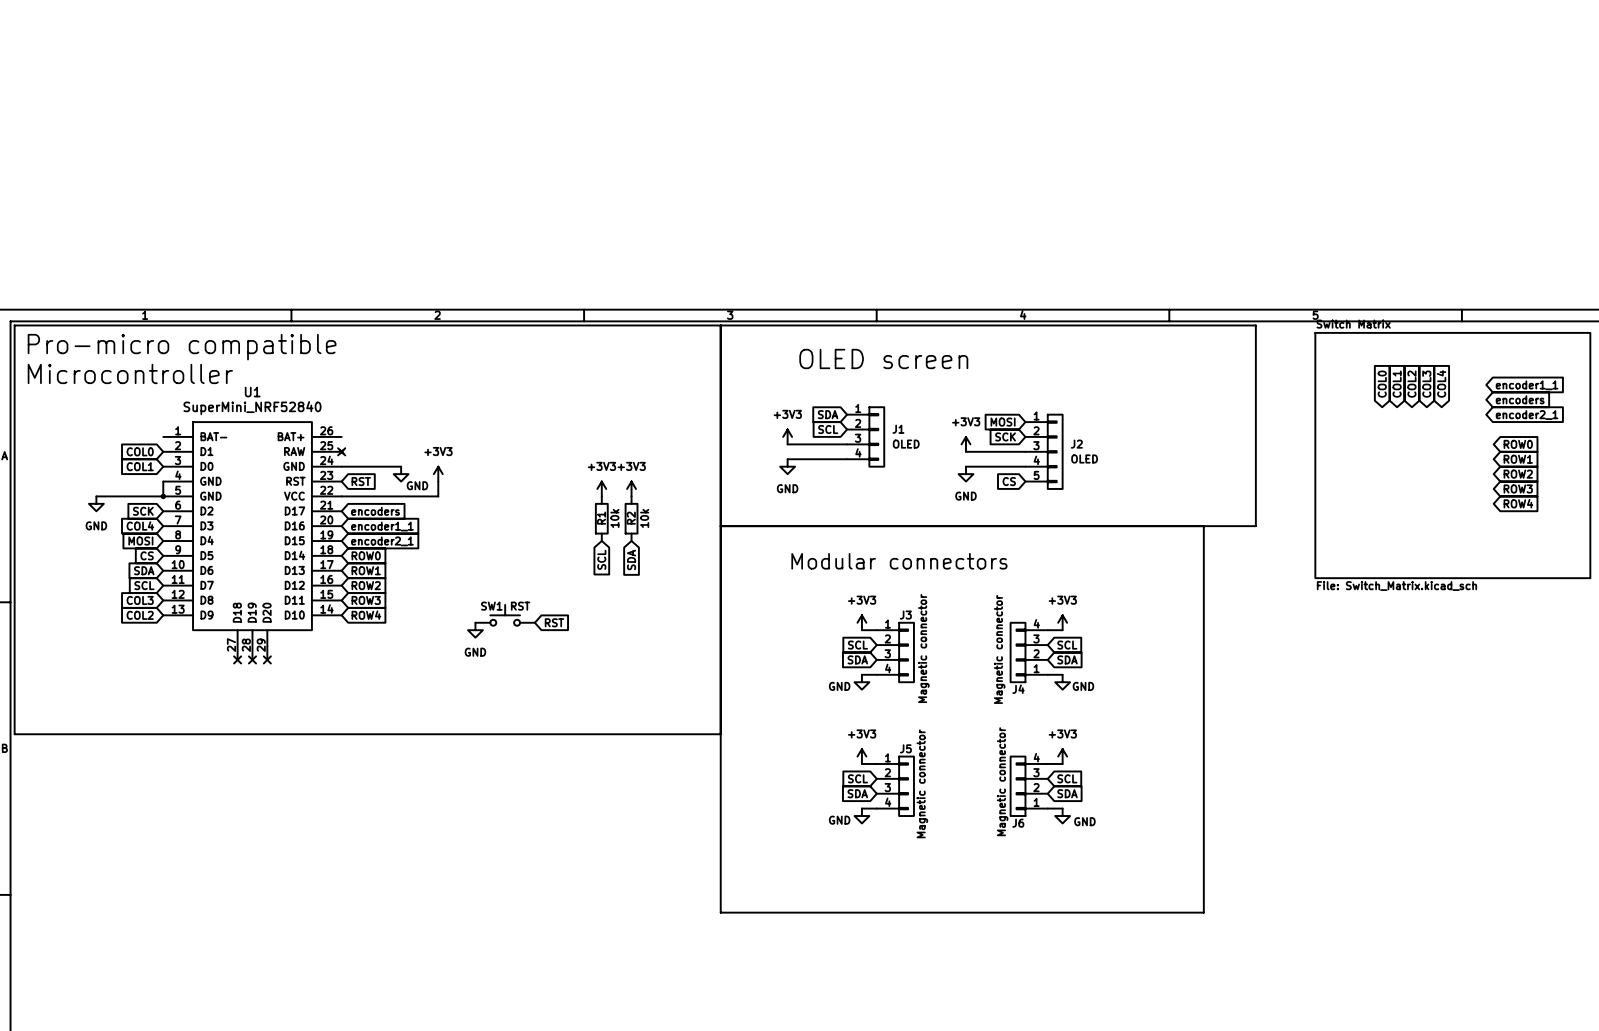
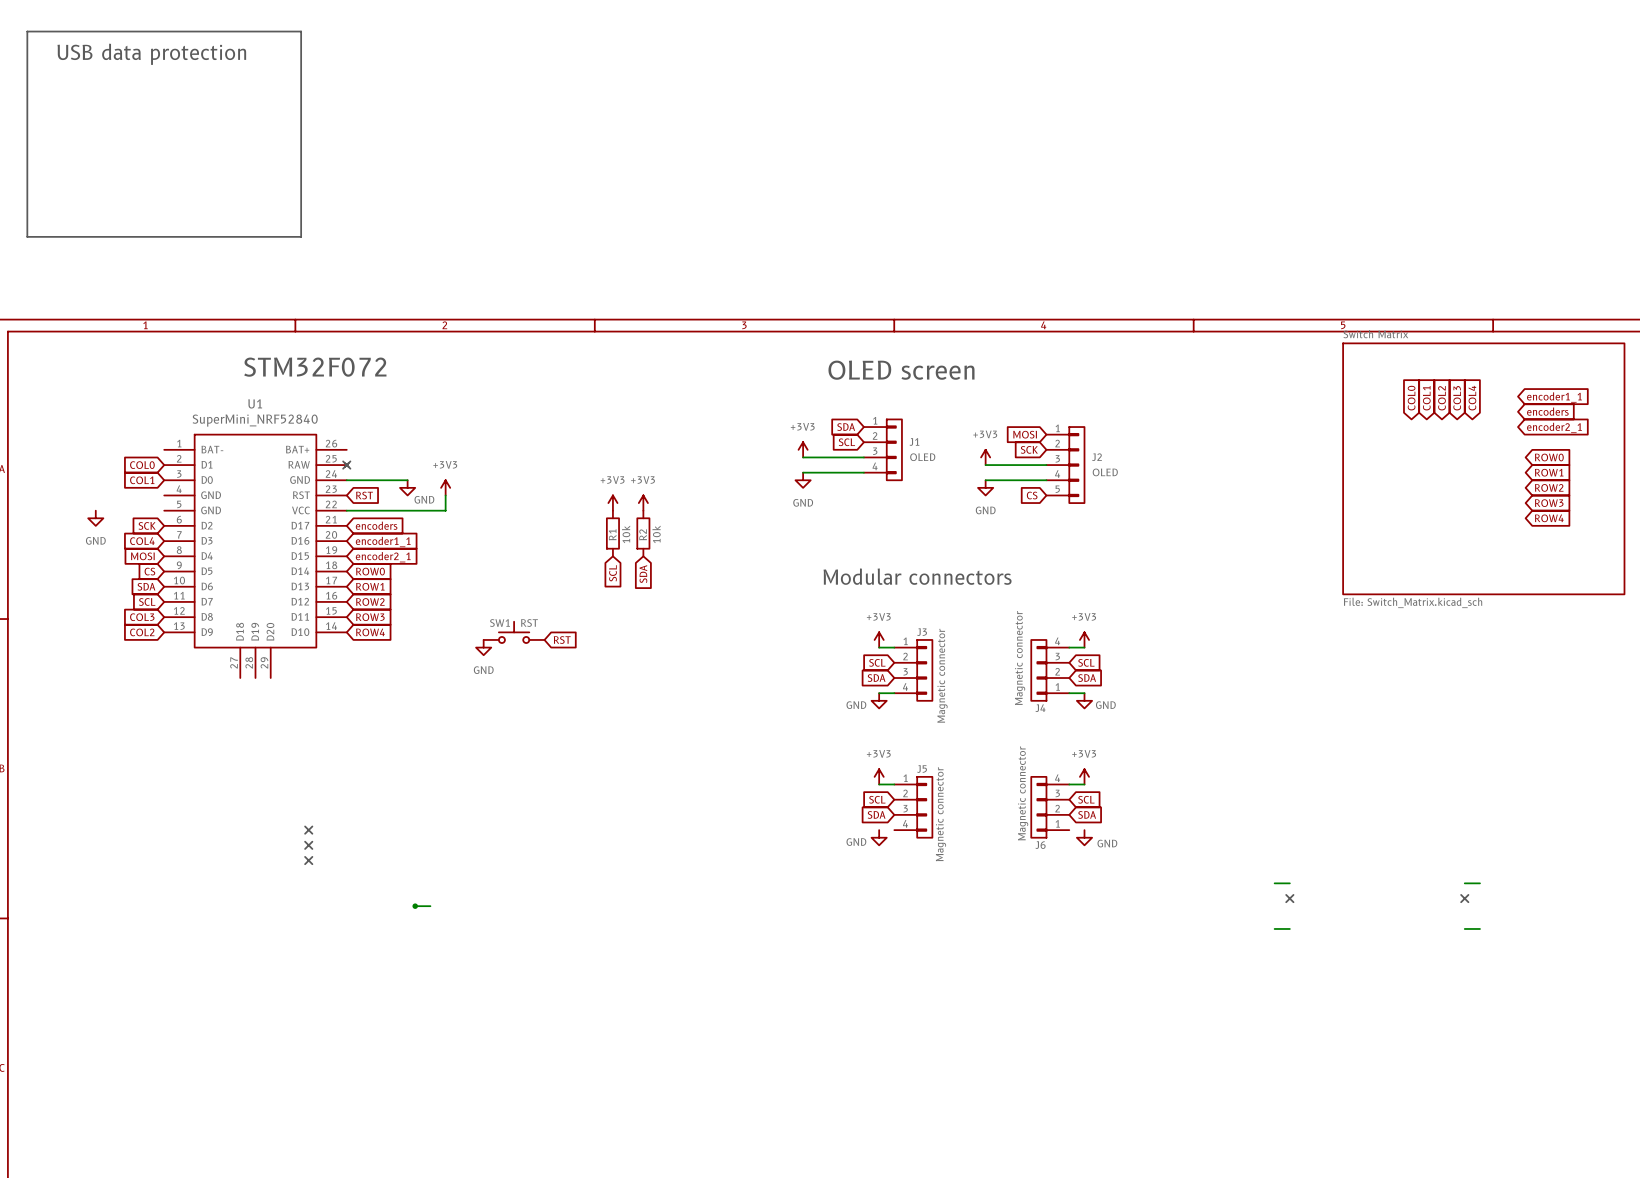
line: none -> (27, 31) (301, 31) (301, 236) (27, 236) (27, 31)
text: none -> USB data protection (151, 54)
line: (720, 325) (720, 912) (1203, 912) (1203, 526) -> none
text: Pro-micro compatible (182, 347) -> none
text: none -> STM32F072 (315, 367)
text: Microcontroller (130, 373) -> none
wire: (163, 481) (163, 496) (96, 496) -> none
junction: (163, 496) -> none
line: (720, 526) (1255, 526) (1255, 325) (14, 325) (14, 734) (720, 734) -> none
no-connect mark: (237, 659) -> none
no-connect mark: (252, 659) -> none
no-connect mark: (267, 659) -> none
no-connect mark: none -> (308, 830)
wire: (861, 808) (876, 808) -> none
wire: (1047, 808) (1062, 808) -> none
no-connect mark: none -> (308, 845)
no-connect mark: none -> (308, 860)
wire: none -> (1274, 883) (1289, 883)
wire: none -> (1464, 883) (1479, 883)
no-connect mark: none -> (1289, 898)
no-connect mark: none -> (1464, 898)
wire: none -> (415, 906) (430, 906)
junction: none -> (415, 906)
wire: none -> (1274, 928) (1289, 928)
wire: none -> (1464, 928) (1479, 928)

